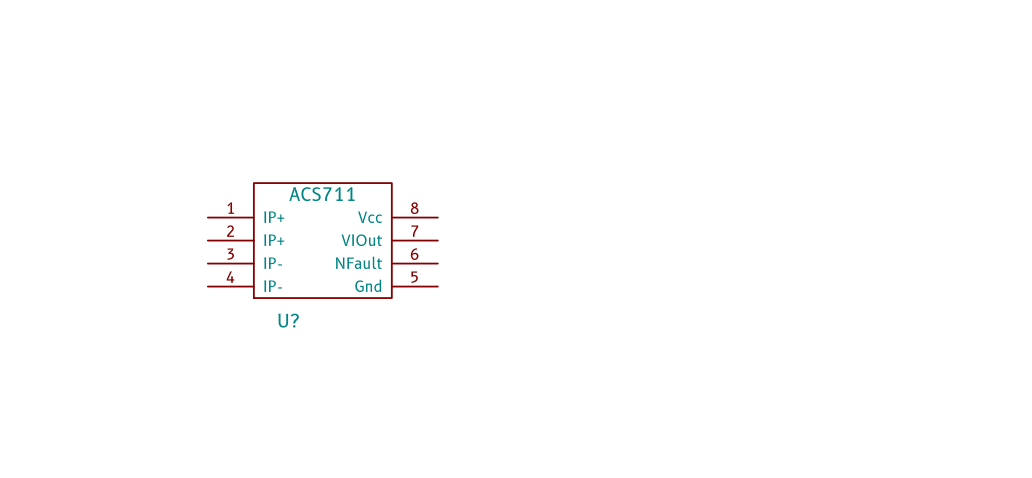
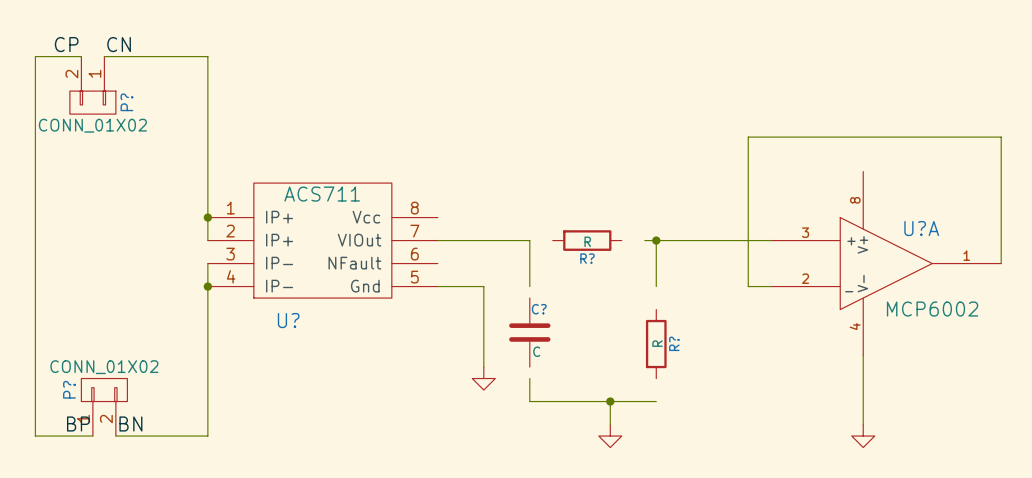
label: none -> CP (66, 44)
label: none -> CN (119, 44)
wire: none -> (81, 56) (35, 56) (35, 436) (92, 436)
wire: none -> (104, 56) (207, 56) (207, 240)
P?: none -> CONN_01X02 (92, 85)
junction: none -> (207, 217)
wire: none -> (437, 240) (529, 240) (529, 286)
R?: none -> R (587, 240)
wire: none -> (644, 240) (771, 240)
wire: none -> (656, 240) (656, 286)
junction: none -> (656, 240)
wire: none -> (207, 263) (207, 436) (115, 436)
U?A: none -> MCP6002 (886, 263)
wire: none -> (1001, 263) (1001, 137) (748, 137) (748, 286) (771, 286)
junction: none -> (207, 286)
wire: none -> (437, 286) (483, 286) (483, 367)
C?: none -> C (529, 332)
R?: none -> R (656, 344)
wire: none -> (863, 355) (863, 424)
power symbol: none -> (483, 378)
wire: none -> (529, 378) (529, 401) (656, 401)
wire: none -> (610, 401) (610, 424)
junction: none -> (610, 401)
P?: none -> CONN_01X02 (104, 407)
label: none -> BN (130, 423)
label: none -> BP (78, 423)
power symbol: none -> (610, 436)
power symbol: none -> (863, 436)

